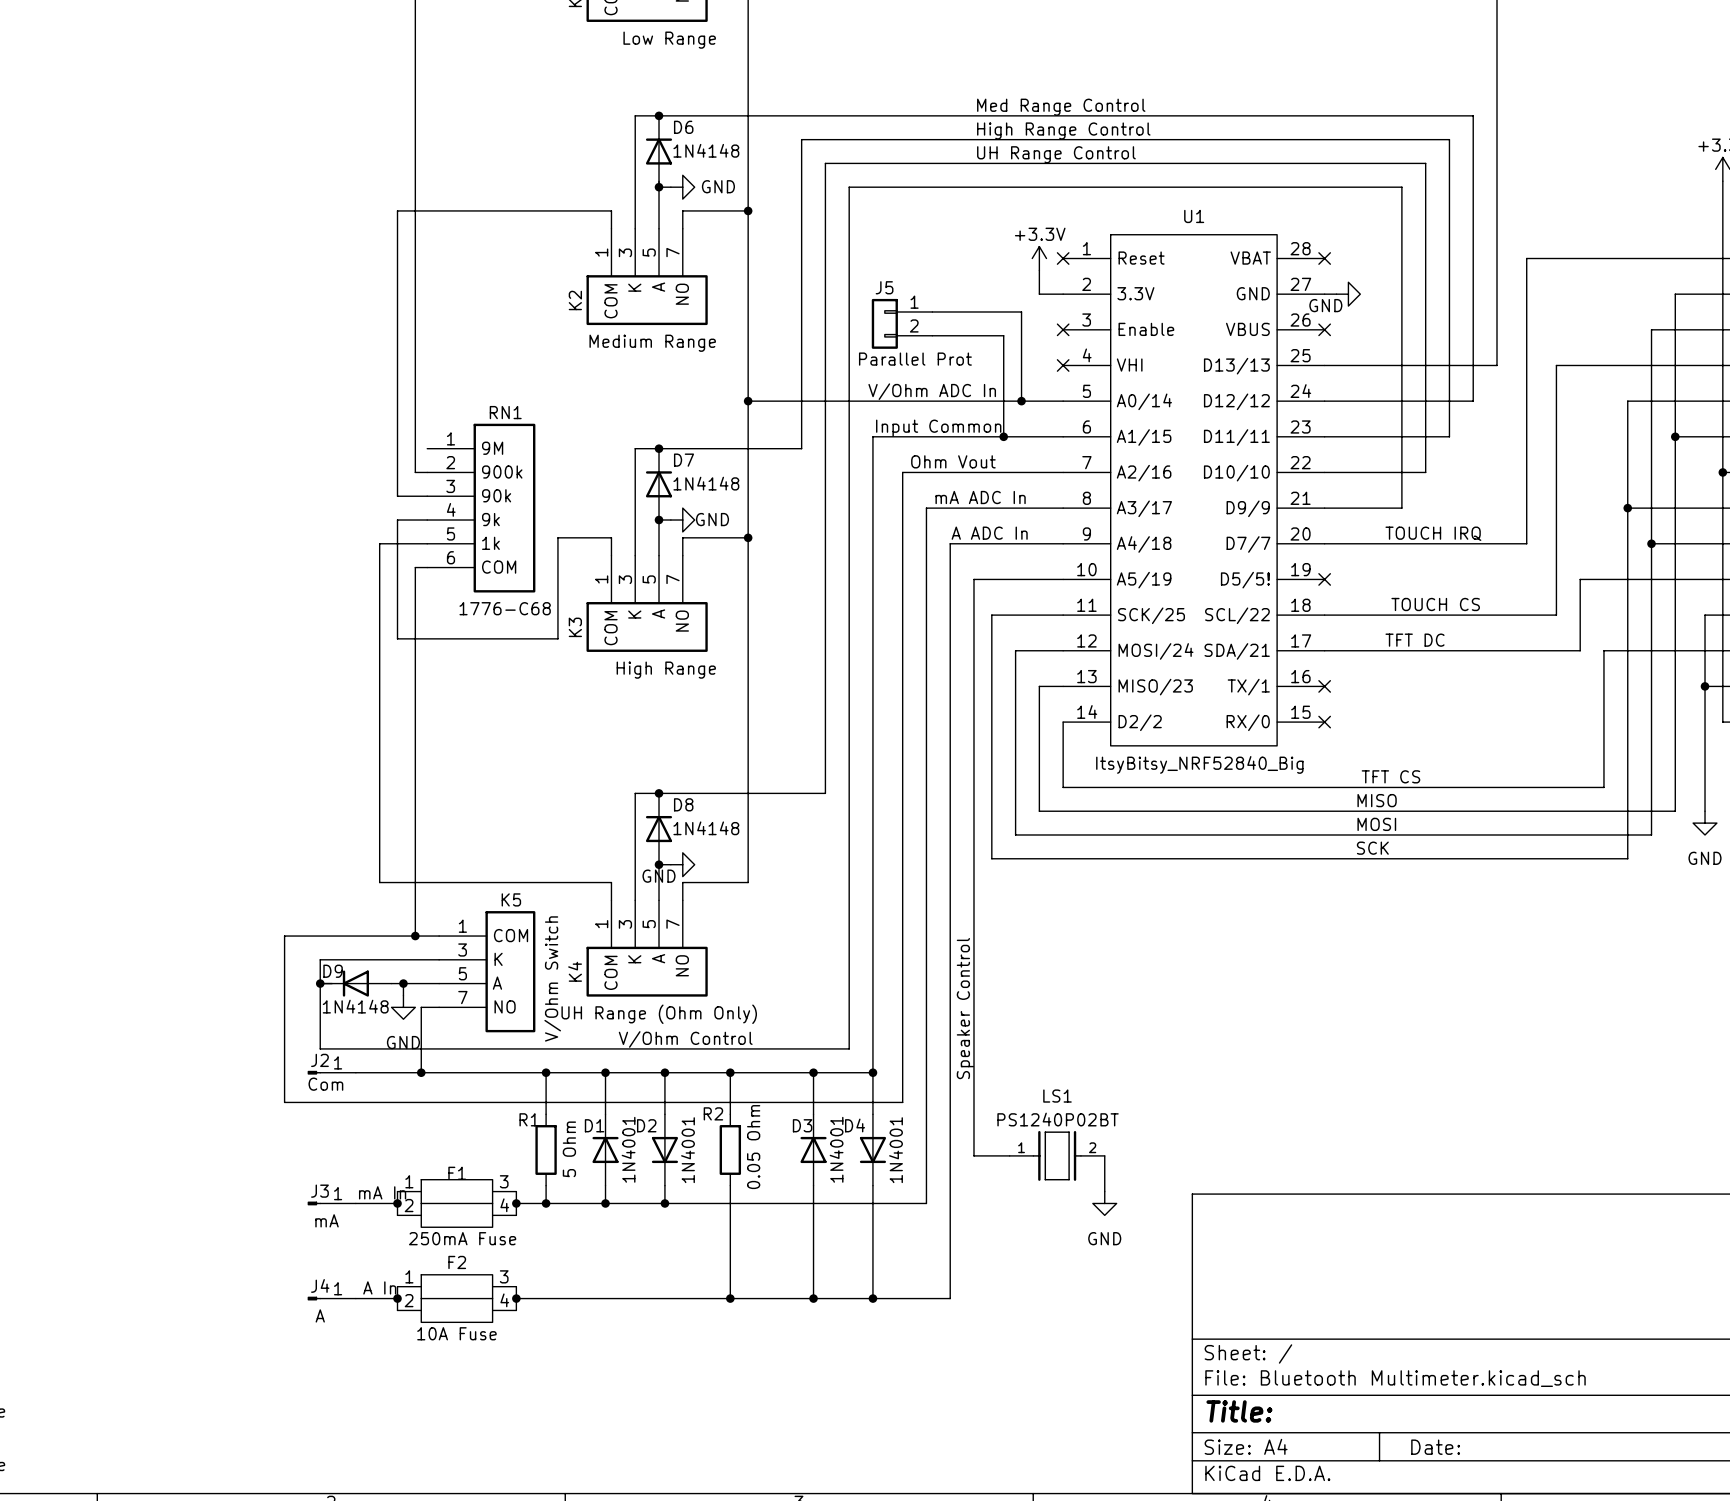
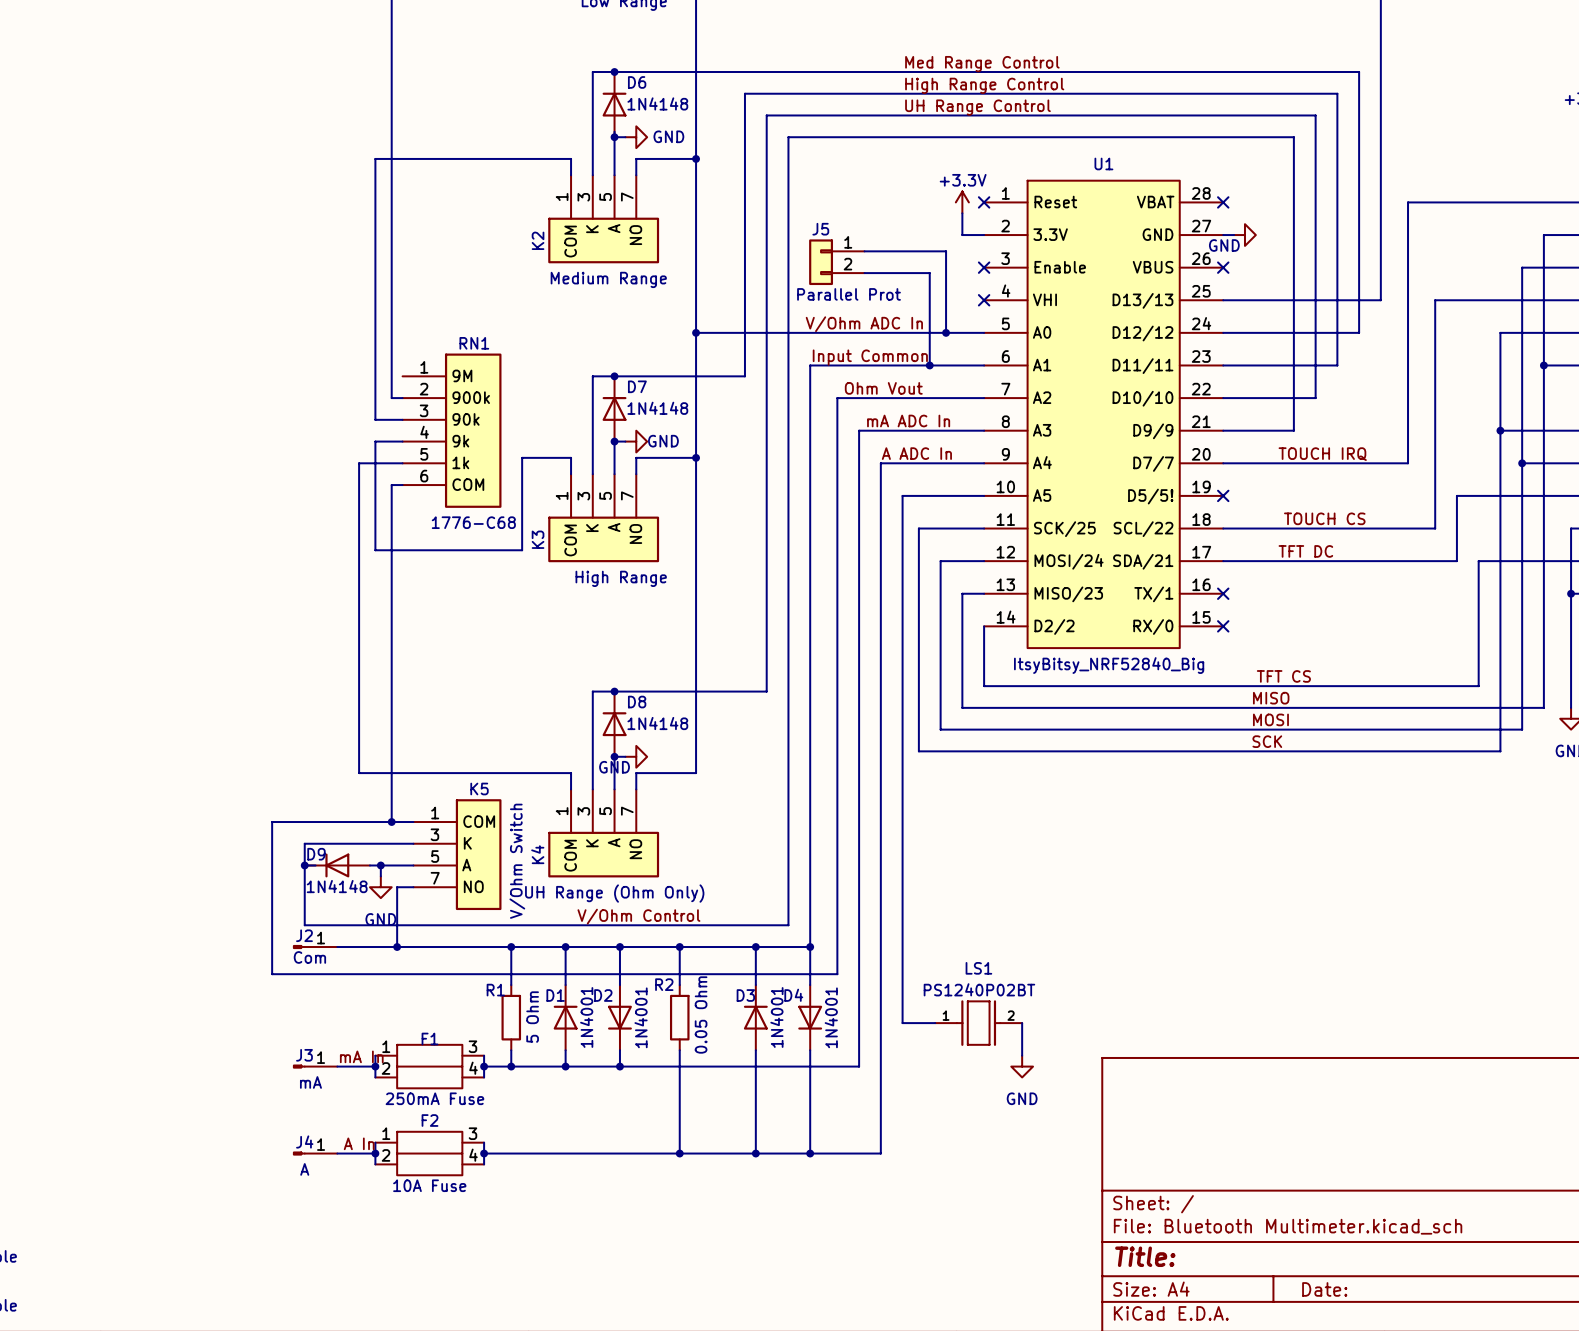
U1 pin name: A0/14 (1144, 401) -> A0 (1042, 332)
U1 pin name: A1/15 (1144, 437) -> A1 (1042, 365)
U1 pin name: A2/16 (1144, 473) -> A2 (1042, 397)
U1 pin name: A3/17 (1144, 508) -> A3 (1042, 430)
U1 pin name: A4/18 (1144, 544) -> A4 (1042, 462)
U1 pin name: A5/19 (1144, 580) -> A5 (1042, 495)
label: Speaker Control (965, 1008) -> none

